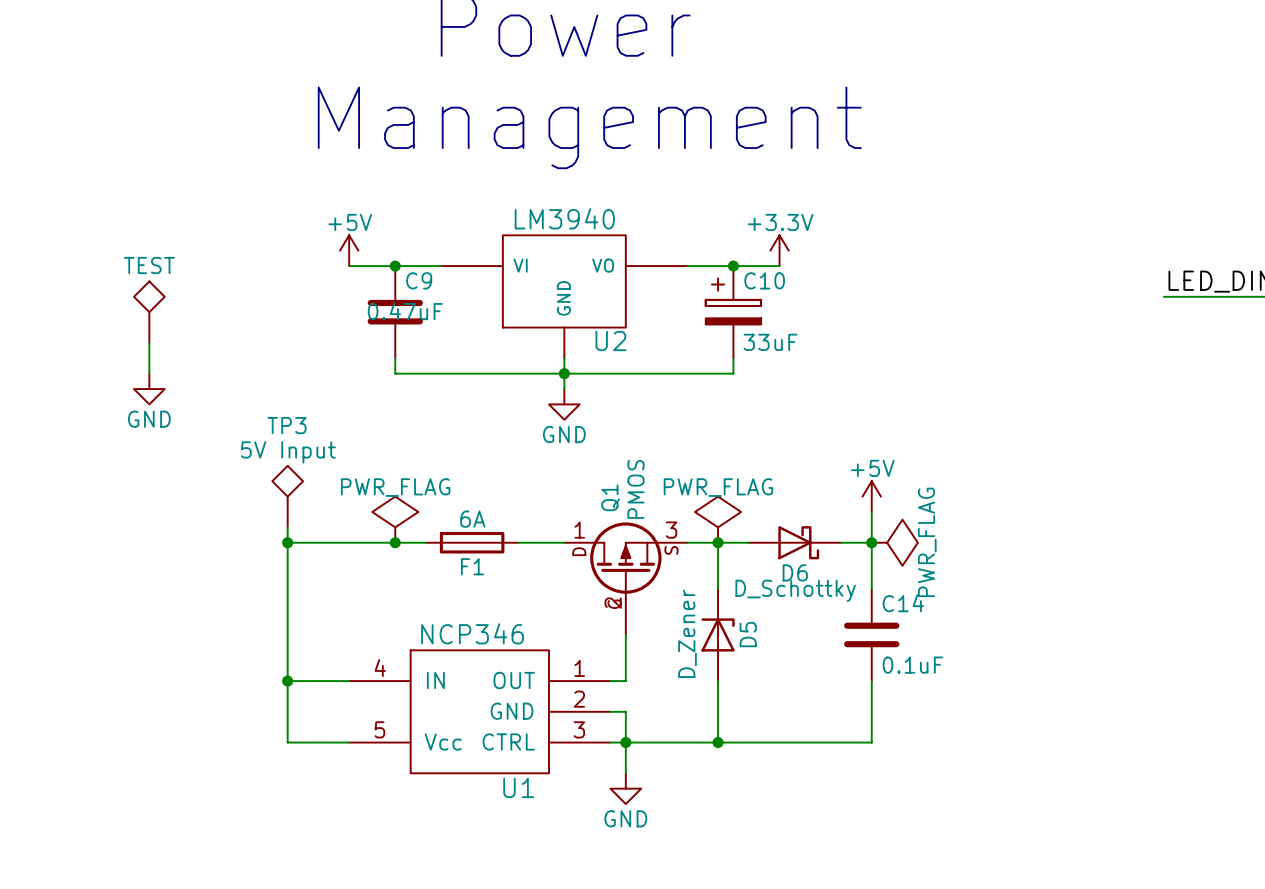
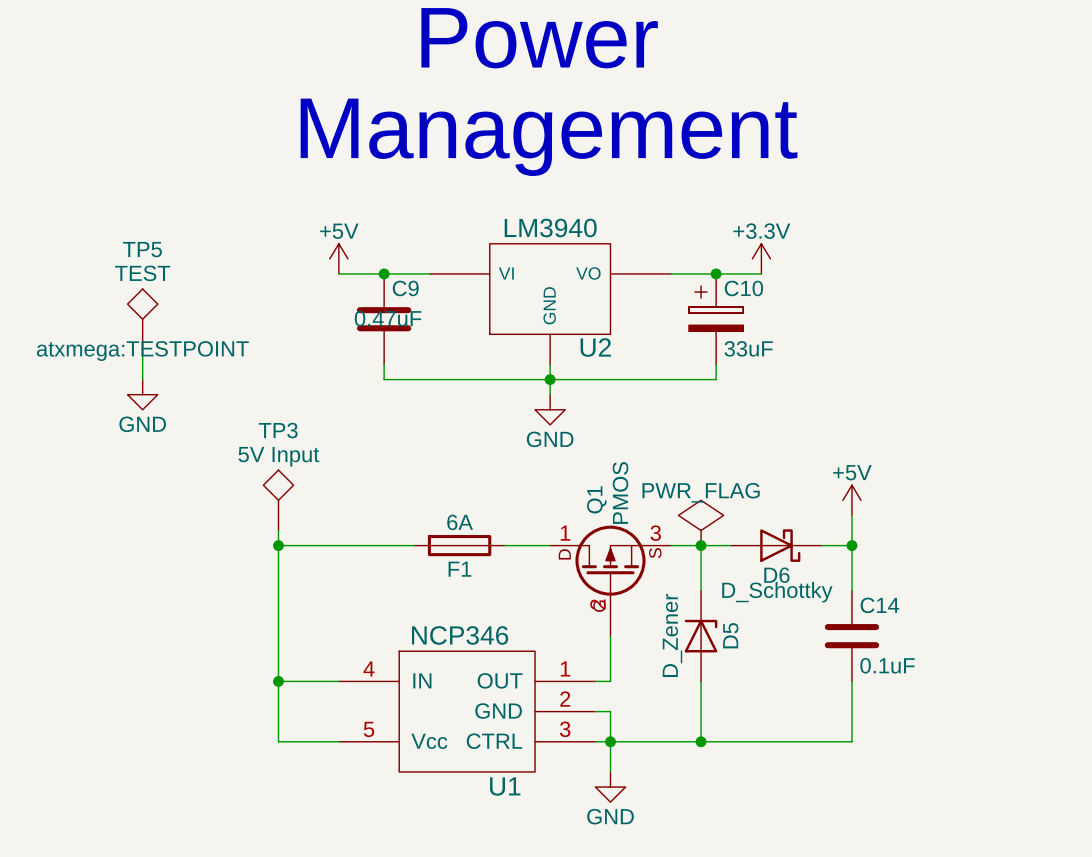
TP5 name: none -> TP5 (142, 249)
TP5 text: none -> atxmega:TESTPOINT (142, 351)
power symbol: PWR_FLAG (395, 519) -> none
junction: (395, 542) -> none
power symbol: PWR_FLAG (894, 542) -> none

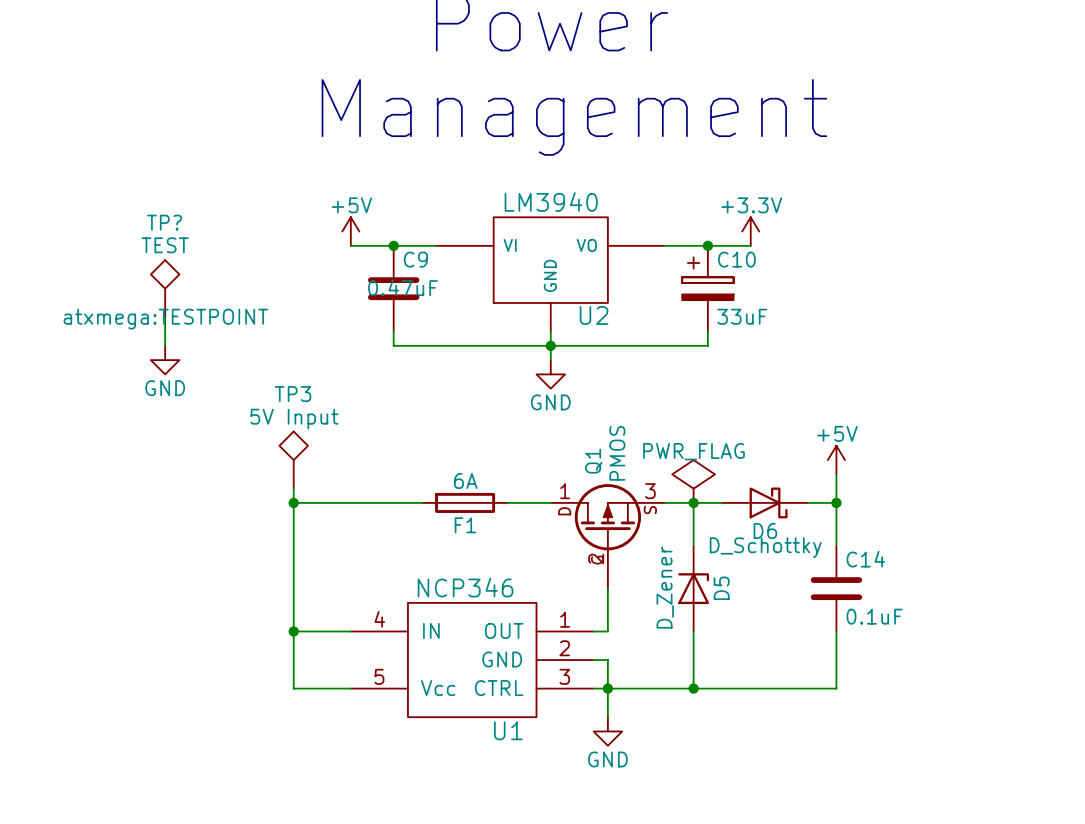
TP5 name: TP5 (142, 249) -> TP? (164, 222)

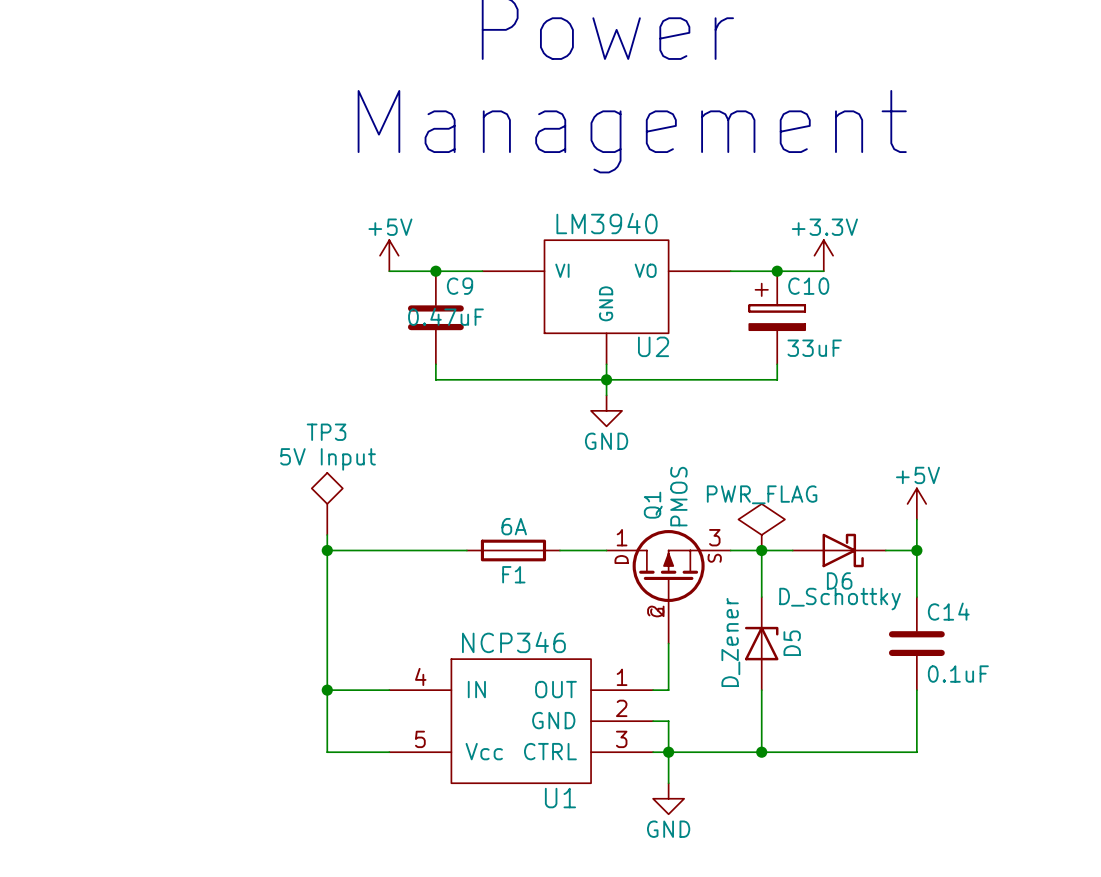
TP?: TEST (165, 288) -> none
wire: (165, 317) (165, 345) -> none
power symbol: GND (165, 360) -> none

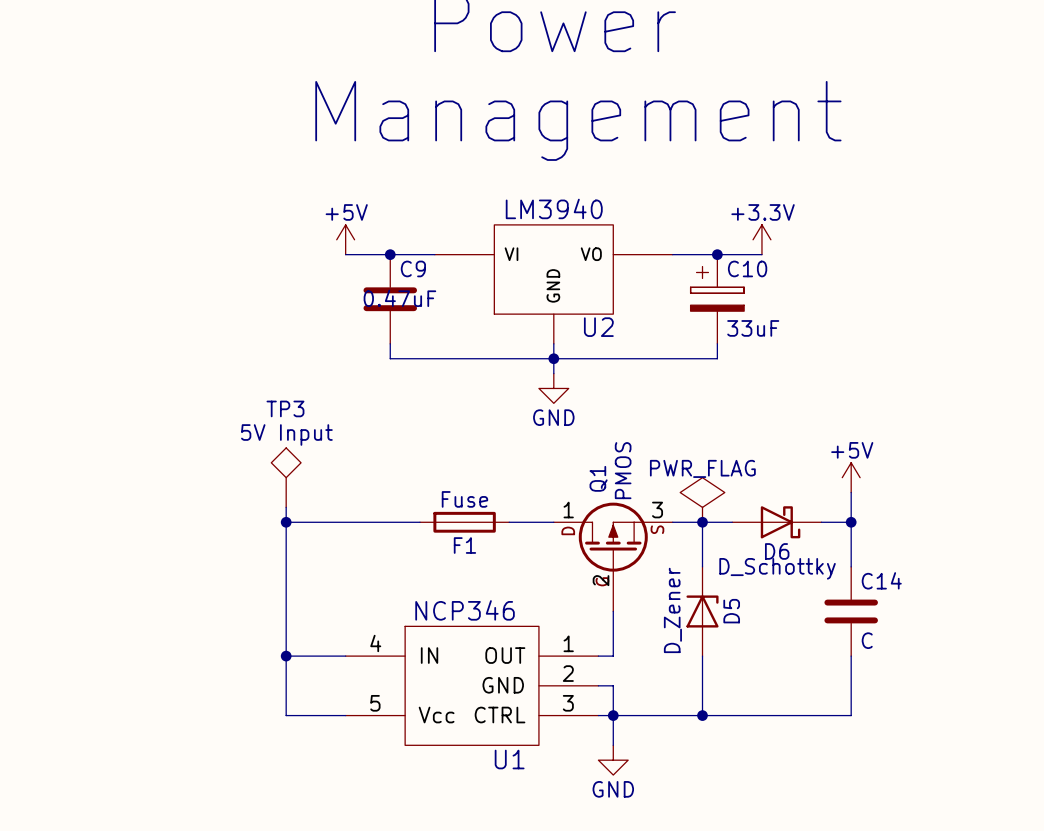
F1 value: 6A (514, 526) -> Fuse (464, 499)
C14 value: 0.1uF (958, 674) -> C (867, 640)

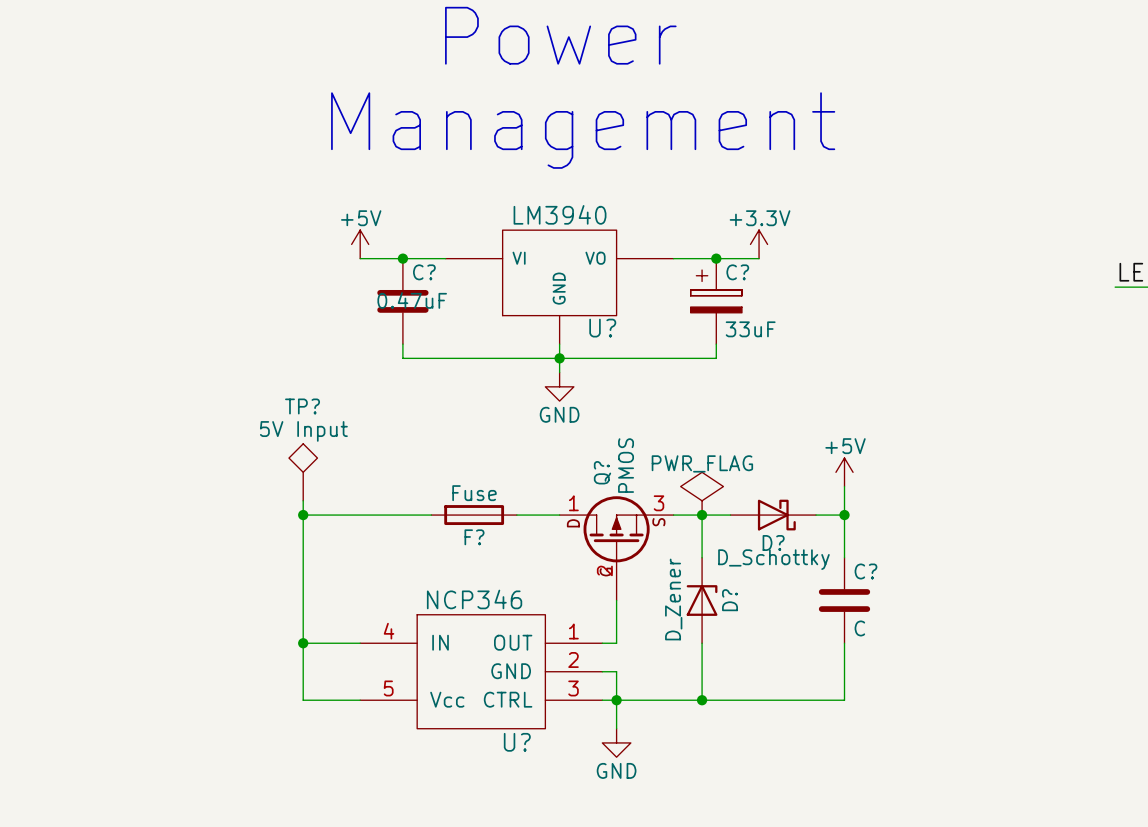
C9 name: C9 (413, 268) -> C? (424, 272)
C10 name: C10 (747, 268) -> C? (737, 272)
U2 name: U2 (598, 327) -> U? (602, 328)
TP3 name: TP3 (285, 408) -> TP? (302, 406)
Q1 name: Q1 (598, 478) -> Q? (602, 472)
F1 name: F1 (464, 545) -> F? (474, 537)
D6 name: D6 (777, 551) -> D? (773, 543)
C14 name: C14 (881, 580) -> C? (865, 571)
D5 name: D5 (731, 611) -> D? (730, 600)
U1 name: U1 (509, 759) -> U? (517, 742)

